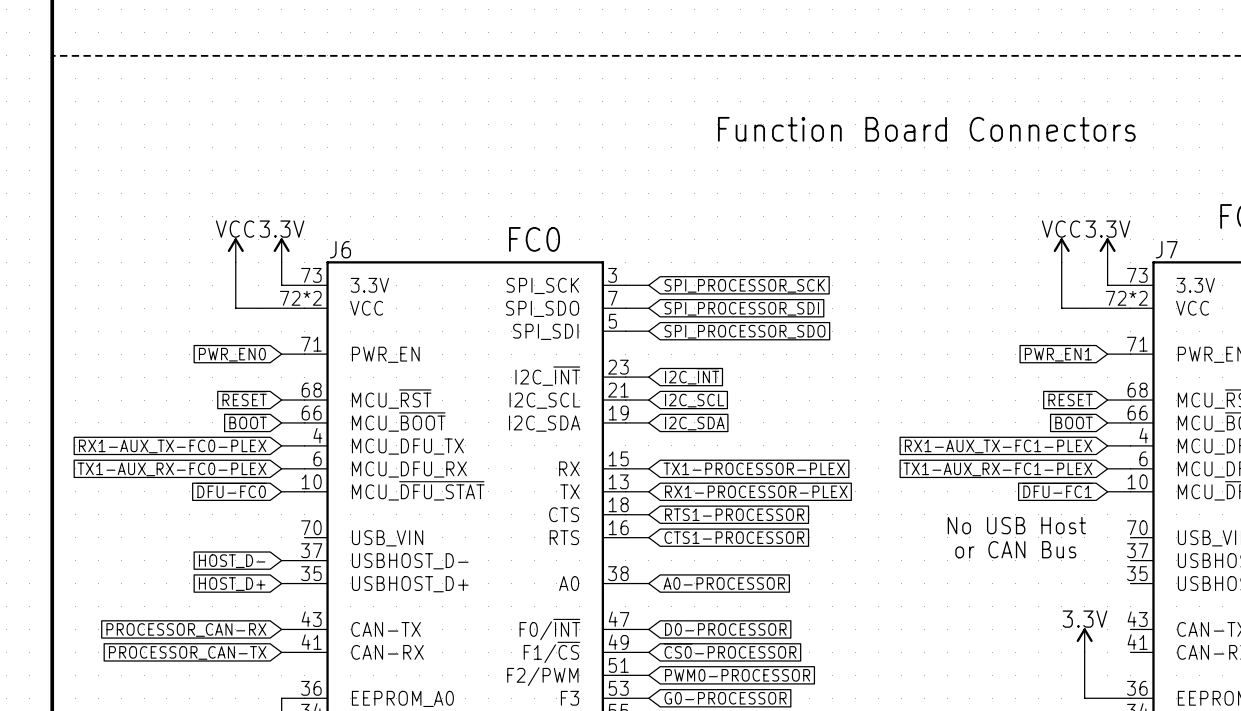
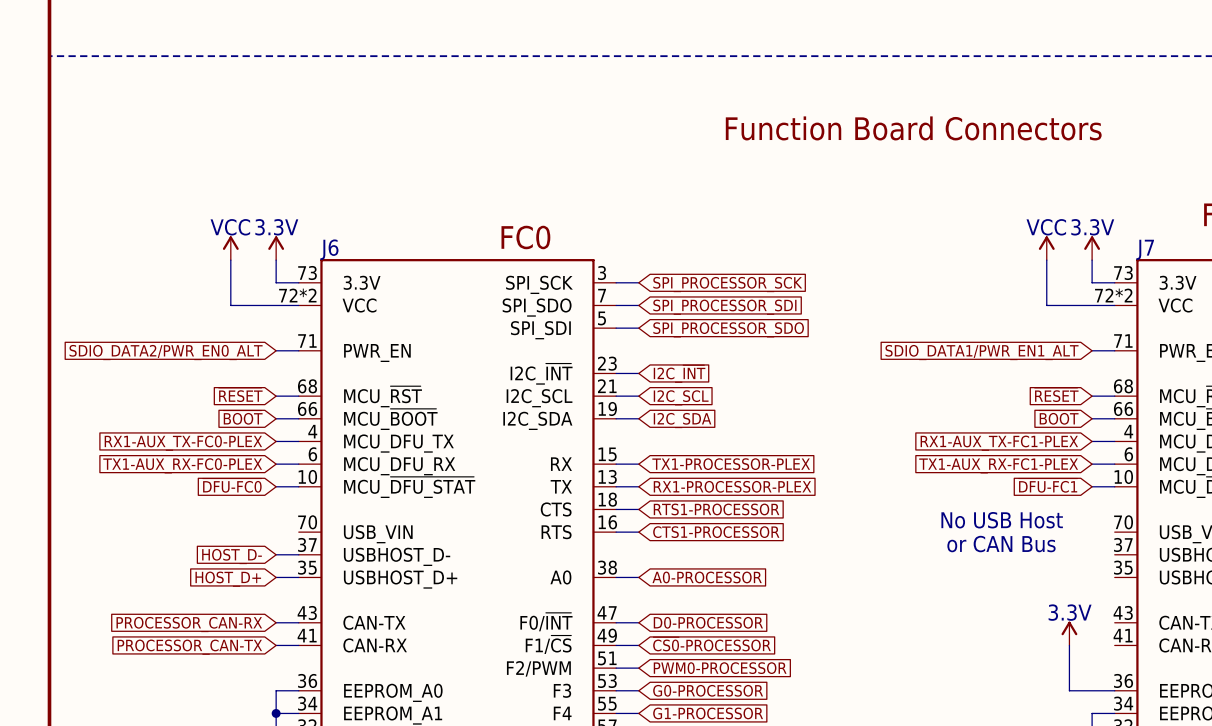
global label: PWR_EN0 (232, 354) -> SDIO_DATA2/PWR_EN0_ALT (166, 352)
global label: PWR_EN1 (1058, 354) -> SDIO_DATA1/PWR_EN1_ALT (982, 352)

